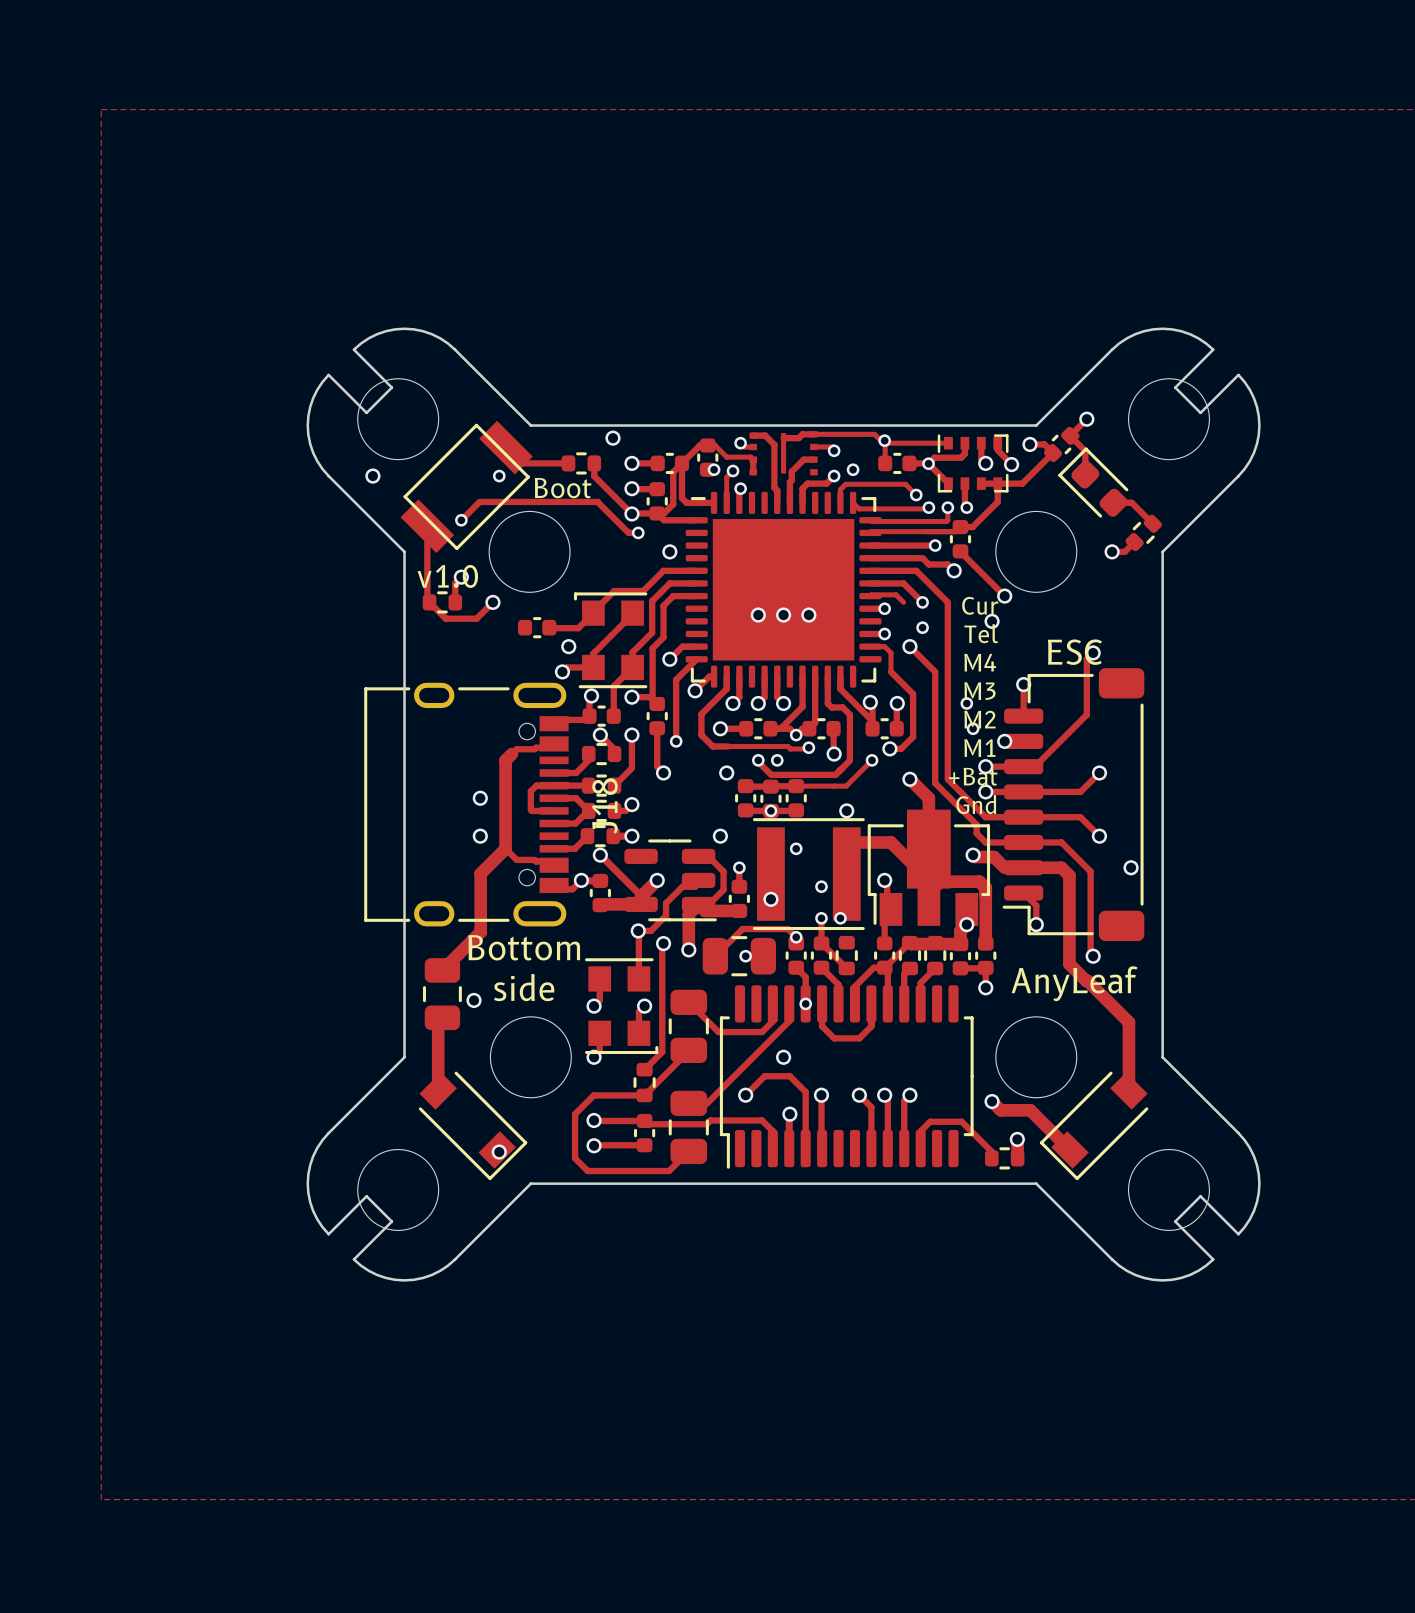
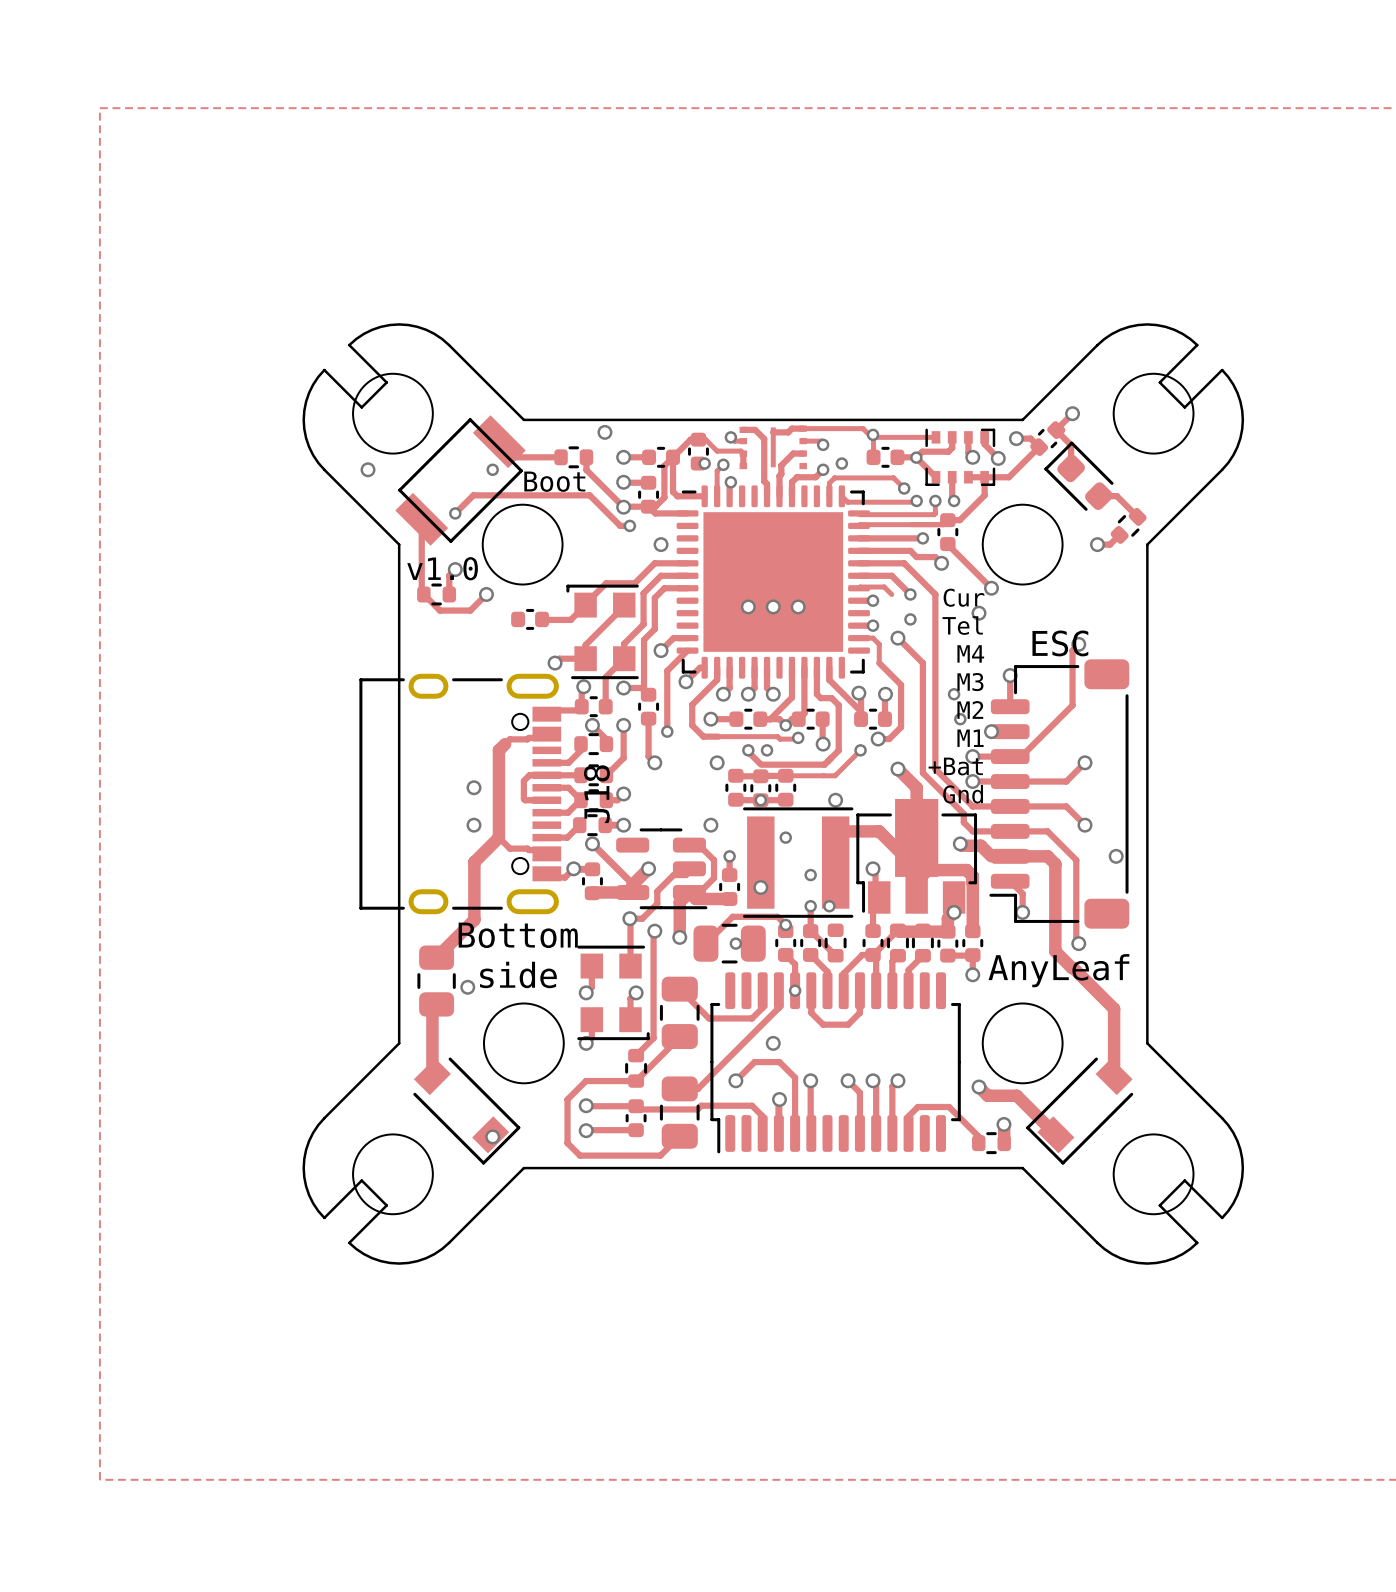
via: (568, 646) -> none

